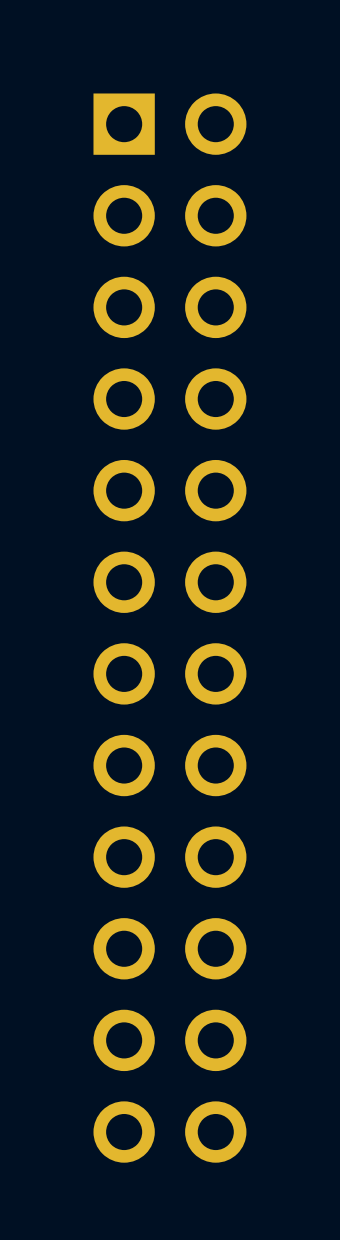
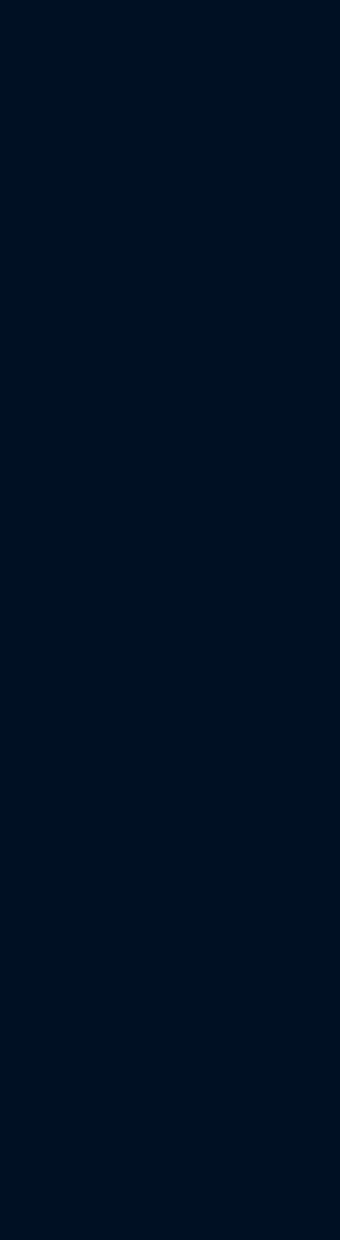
part: (169, 628) -> none

